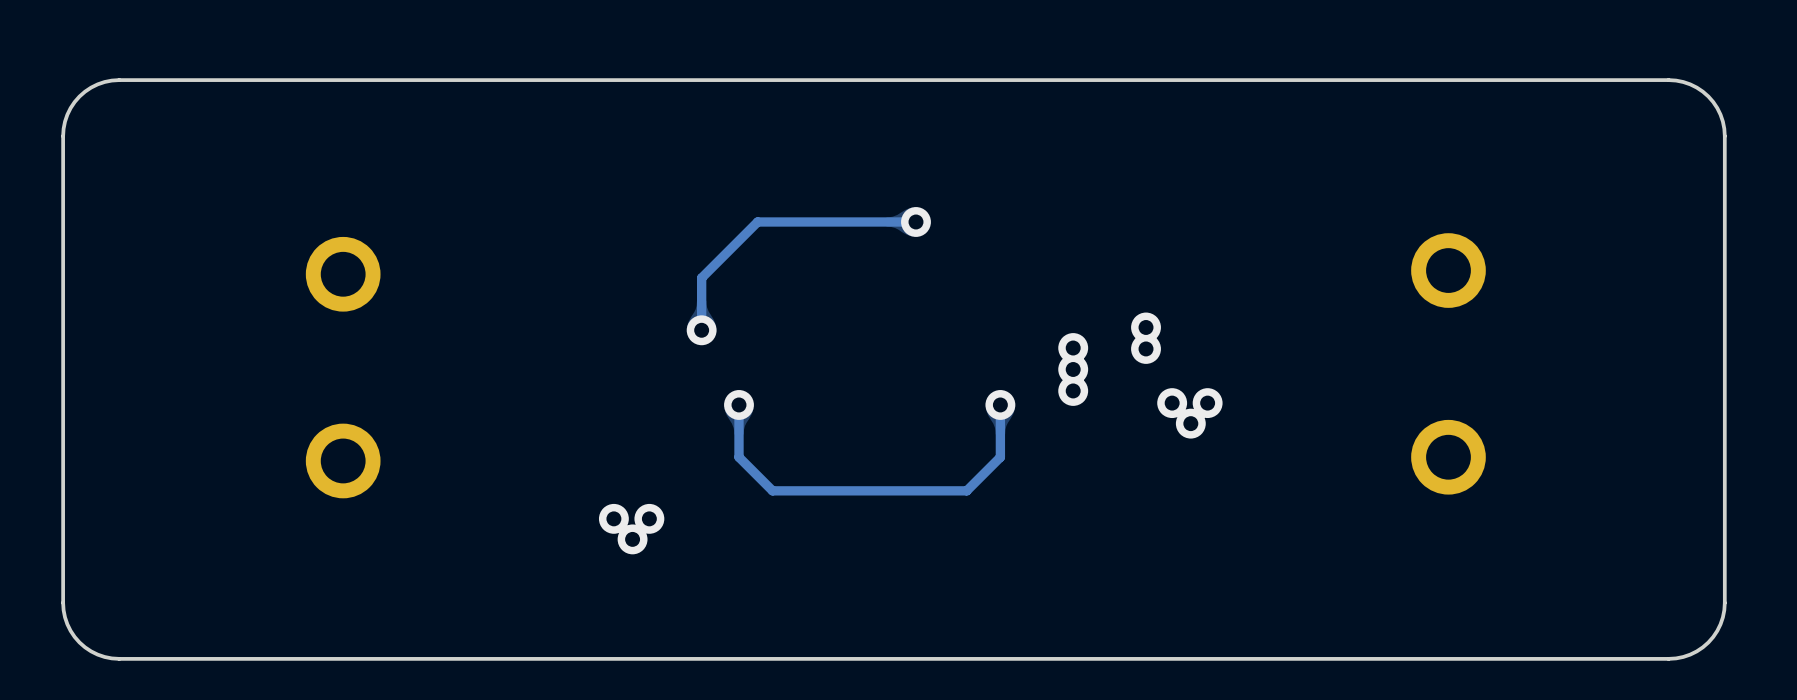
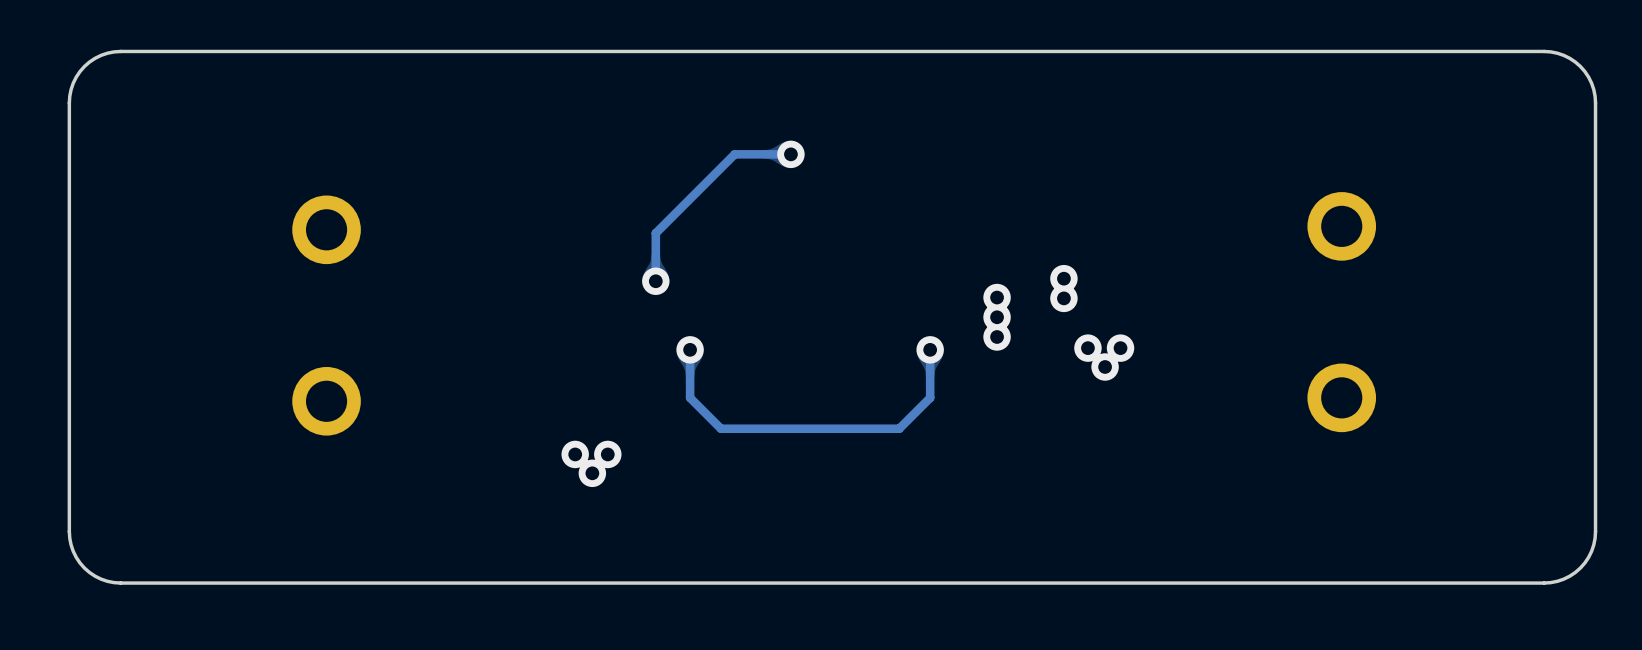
track: (915, 221) (757, 221) -> (790, 154) (734, 154) (707, 181)
via position: (915, 221) -> (790, 154)

